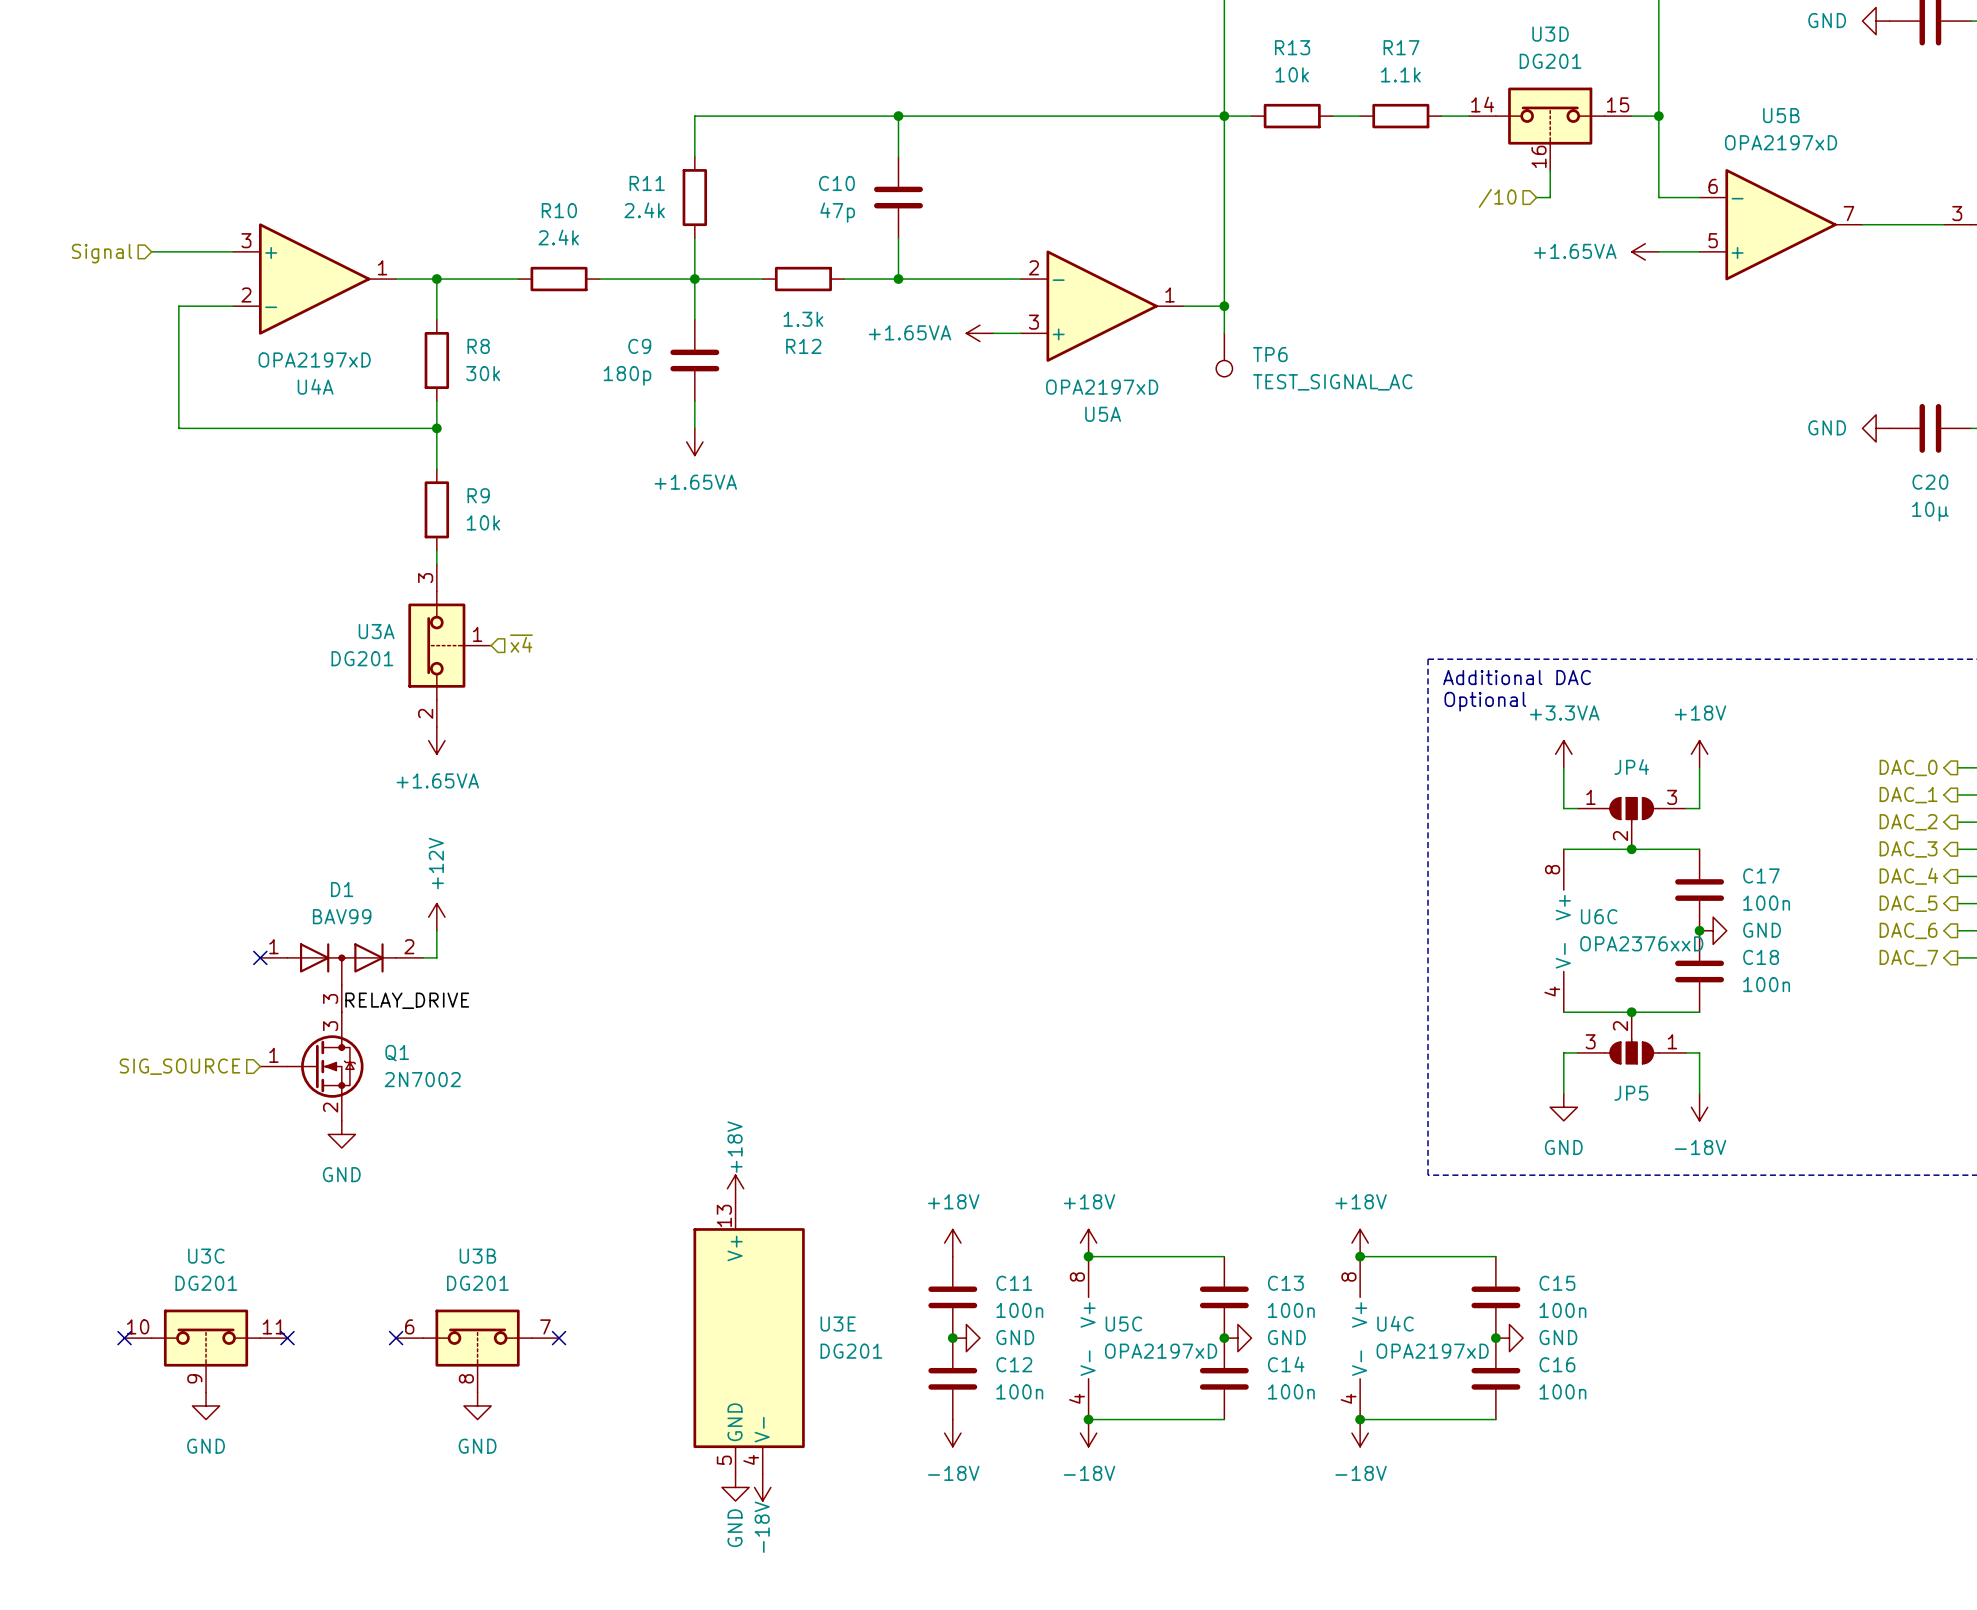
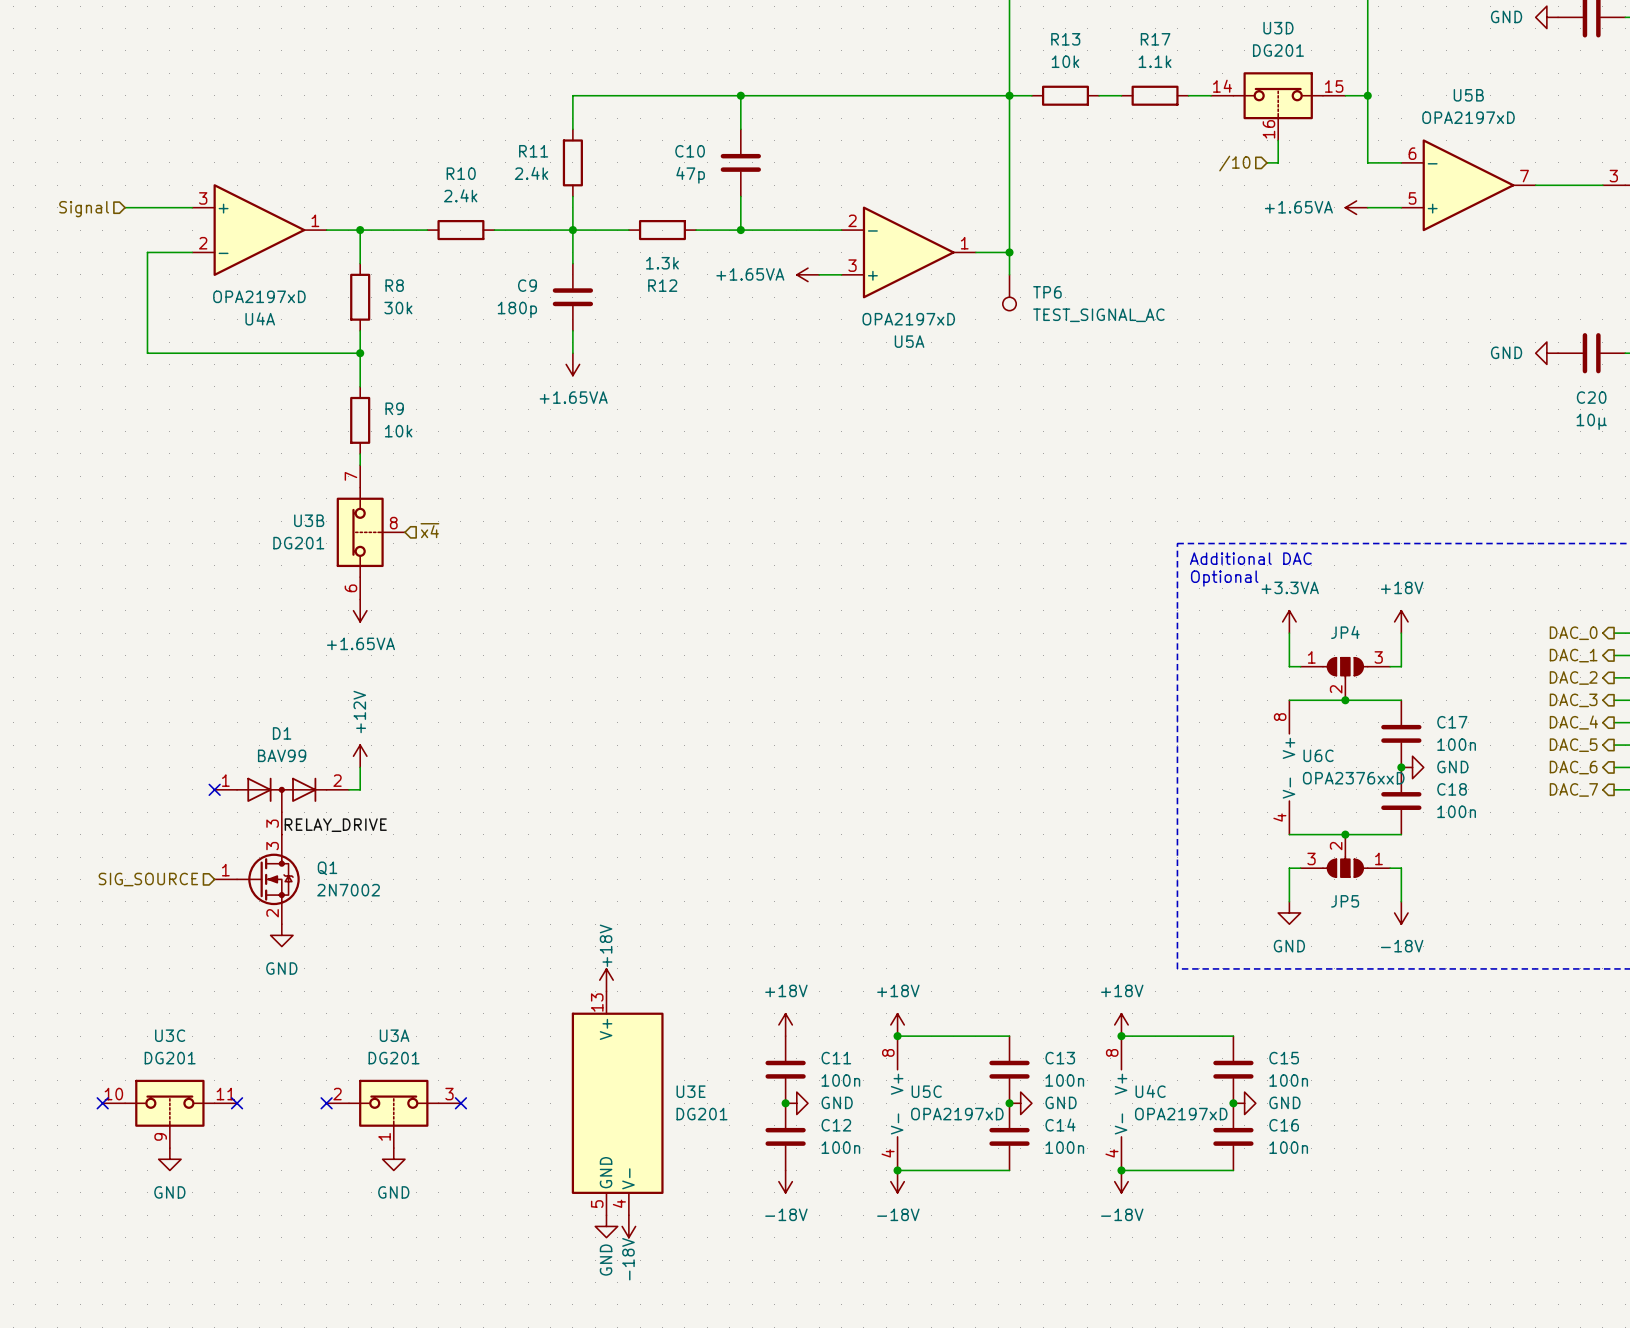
U3A name position: U3A (376, 631) -> U3A (394, 1035)
U3A rotation: 0° (436, 645) -> 90° clockwise (393, 1103)
U3A position: (449, 645) -> (393, 1113)
U3B name position: U3B (477, 1256) -> U3B (309, 520)
U3B rotation: 0° (477, 1338) -> 90° counterclockwise (360, 532)
U3B position: (477, 1350) -> (370, 532)

